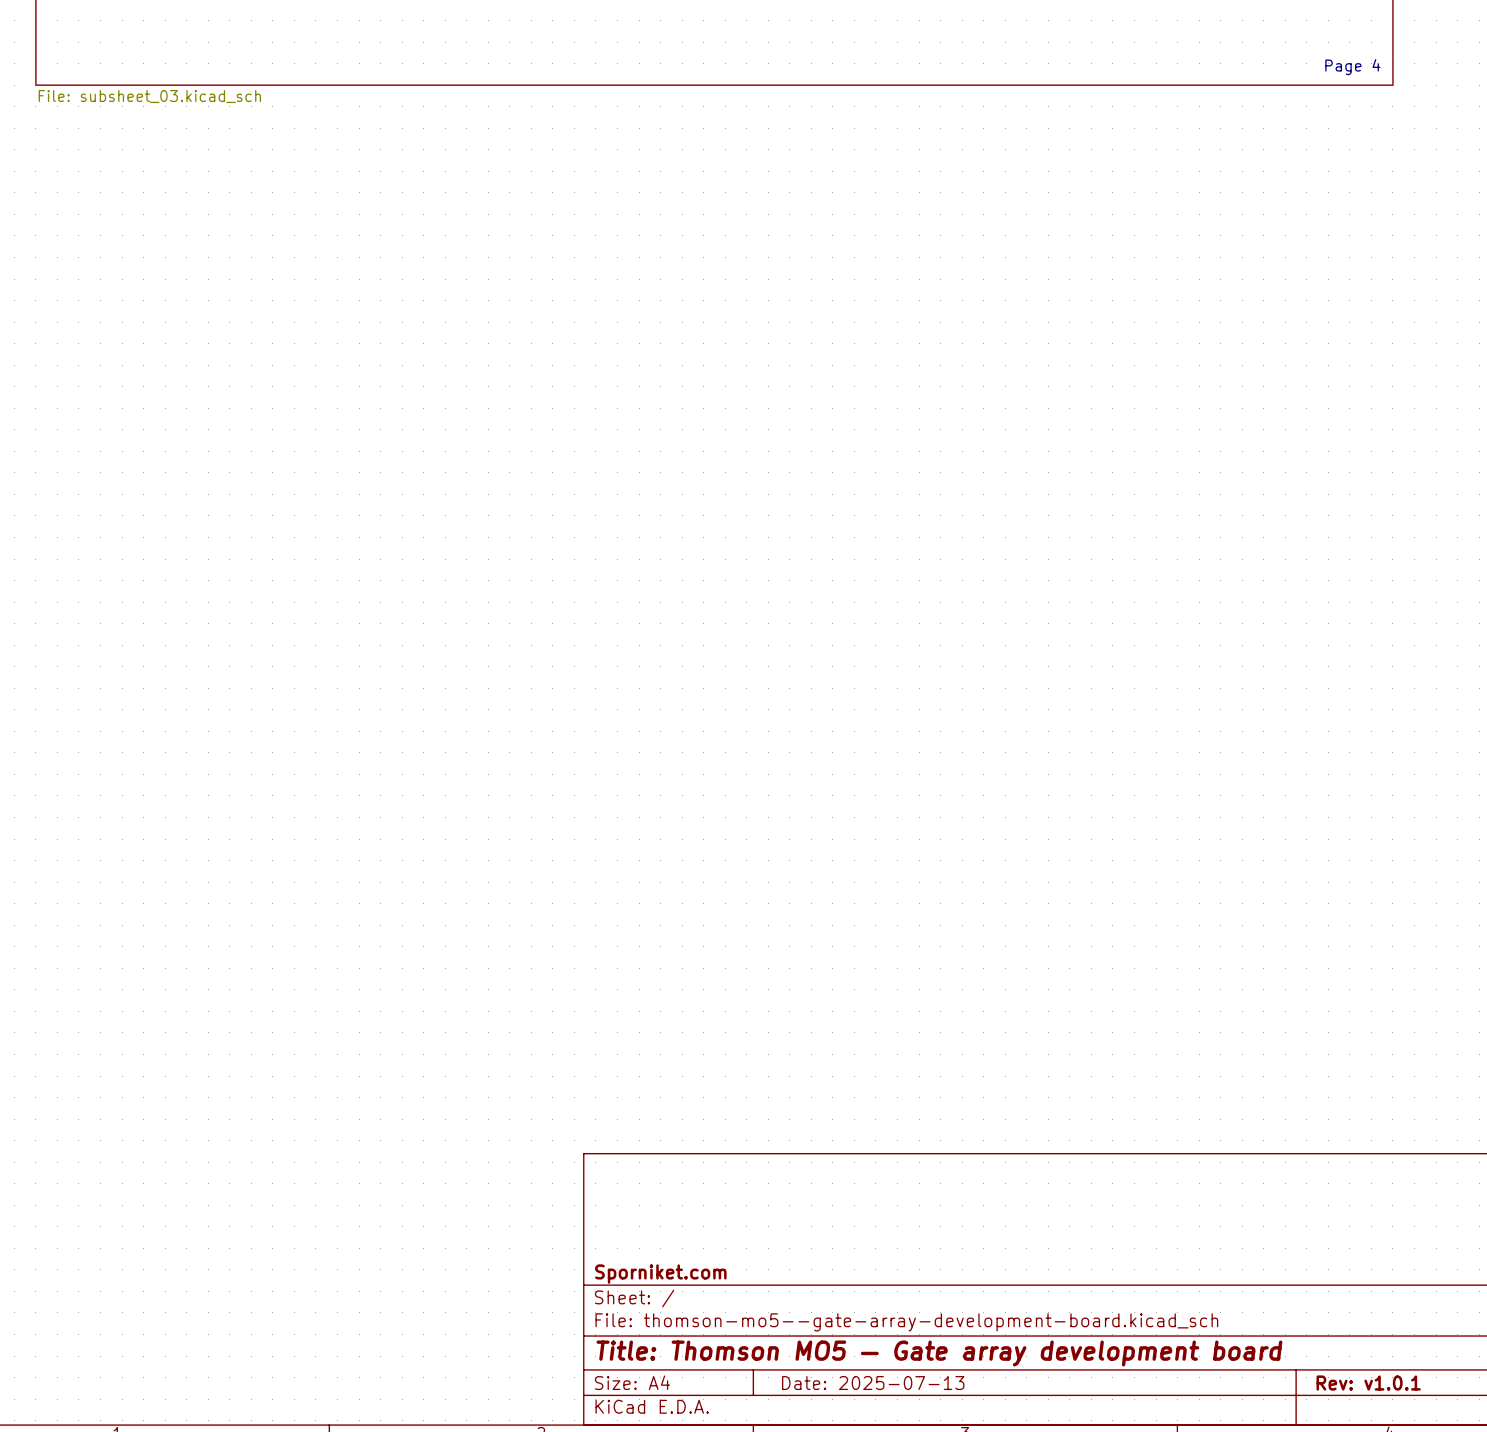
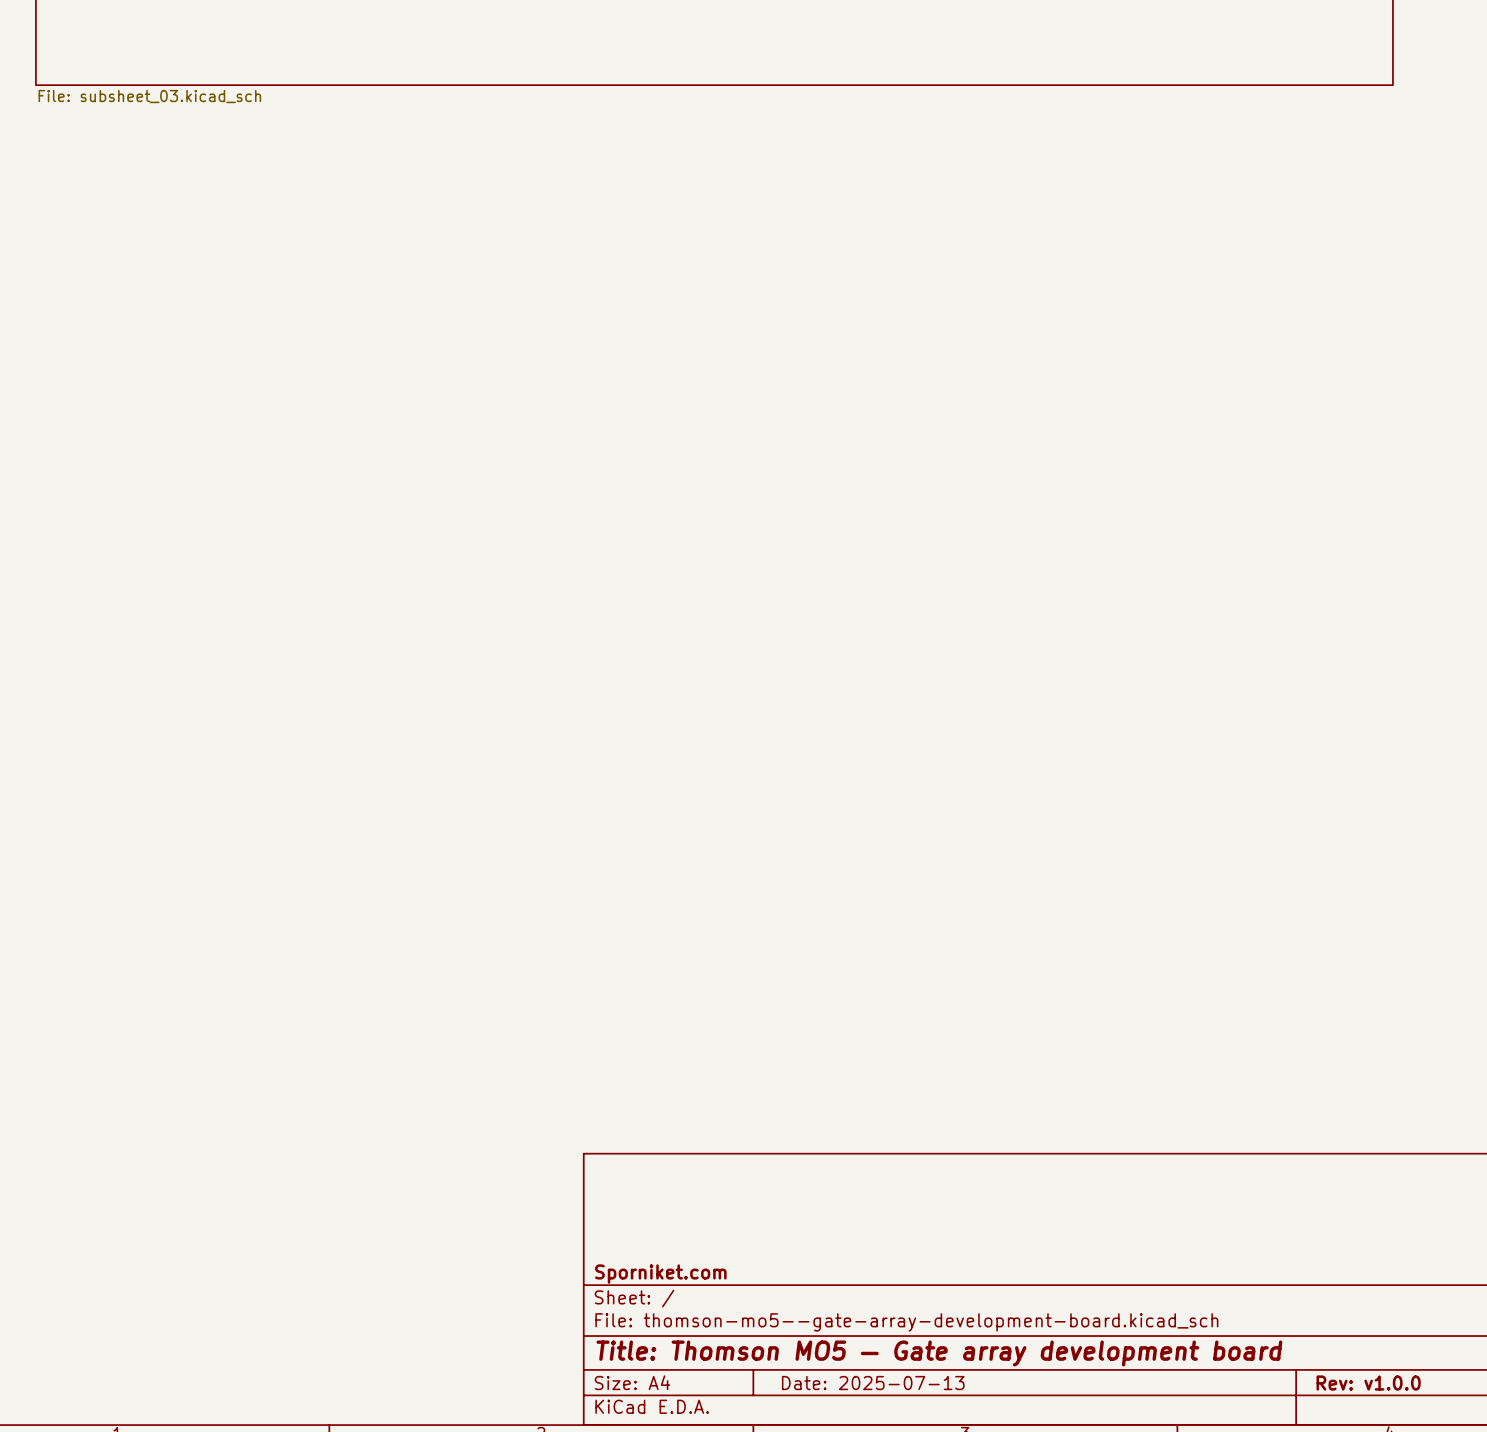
text: Page 4 (1352, 67) -> none
title block: Rev: v1.0.1 (1368, 1383) -> Rev: v1.0.0 (1368, 1383)

